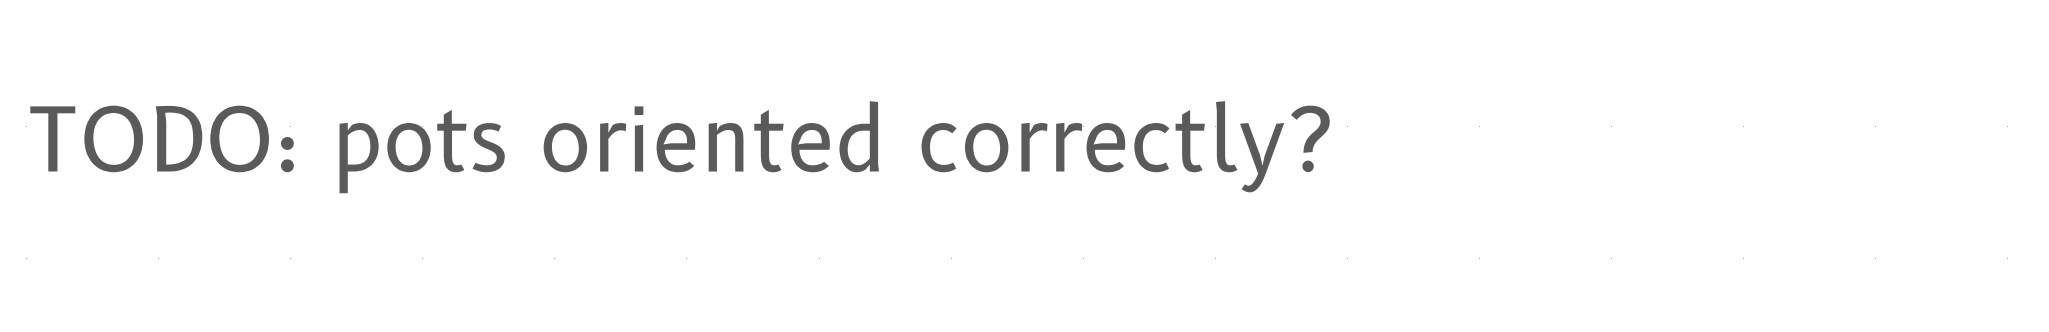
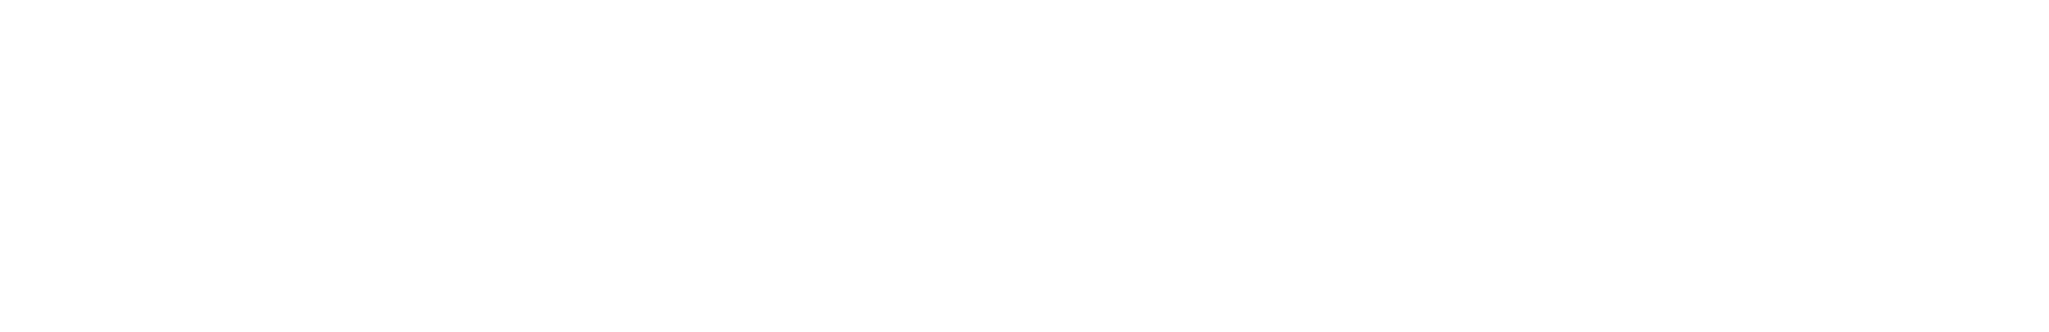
text: TODO: pots oriented correctly? (680, 147) -> none

